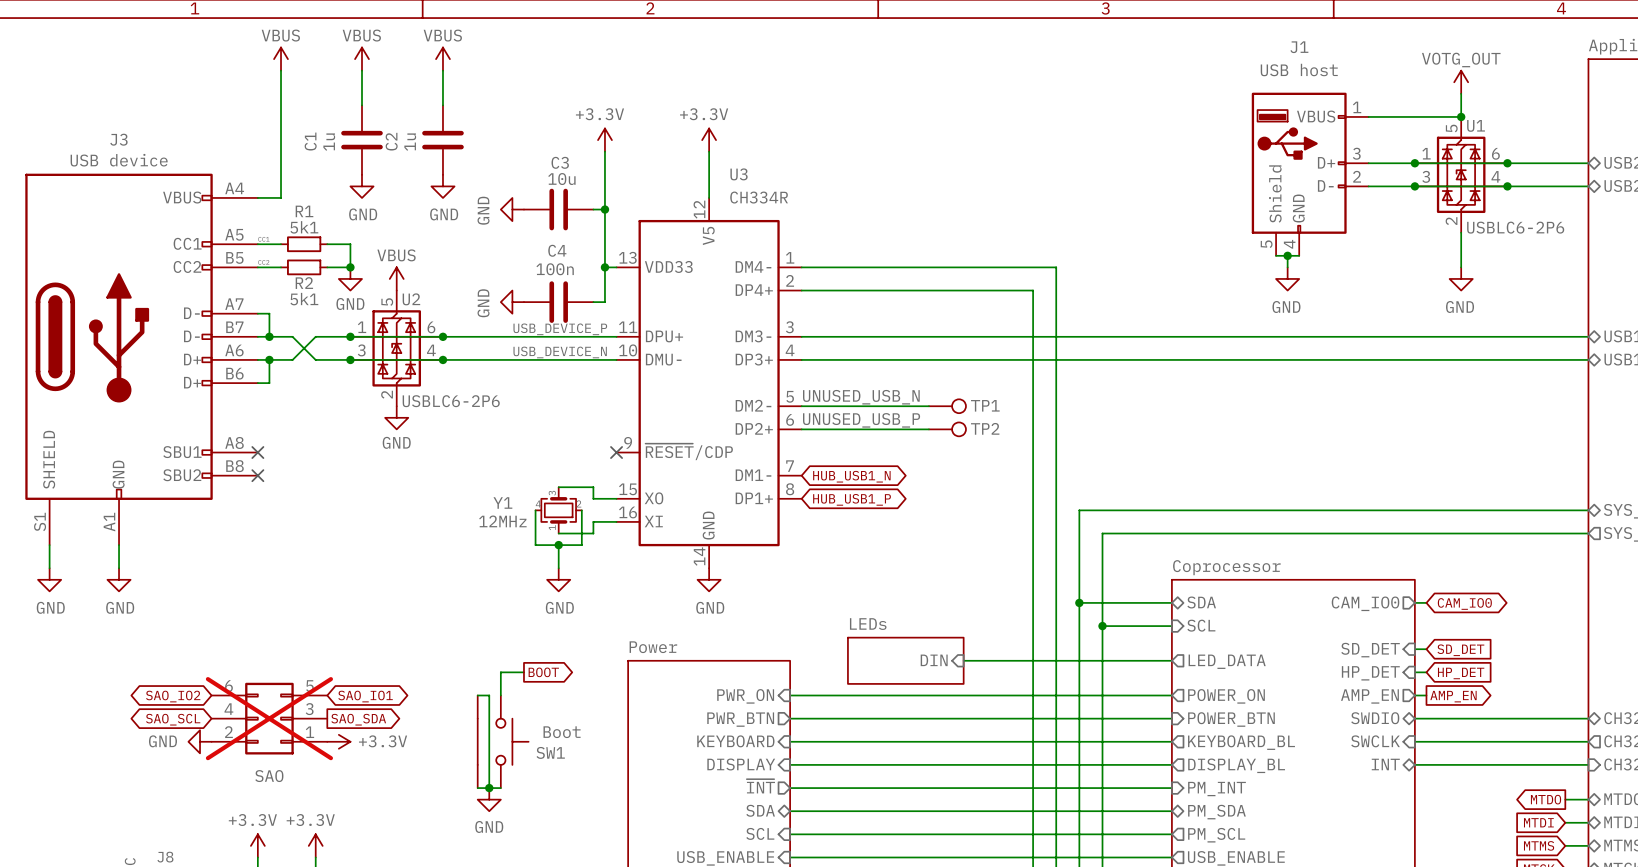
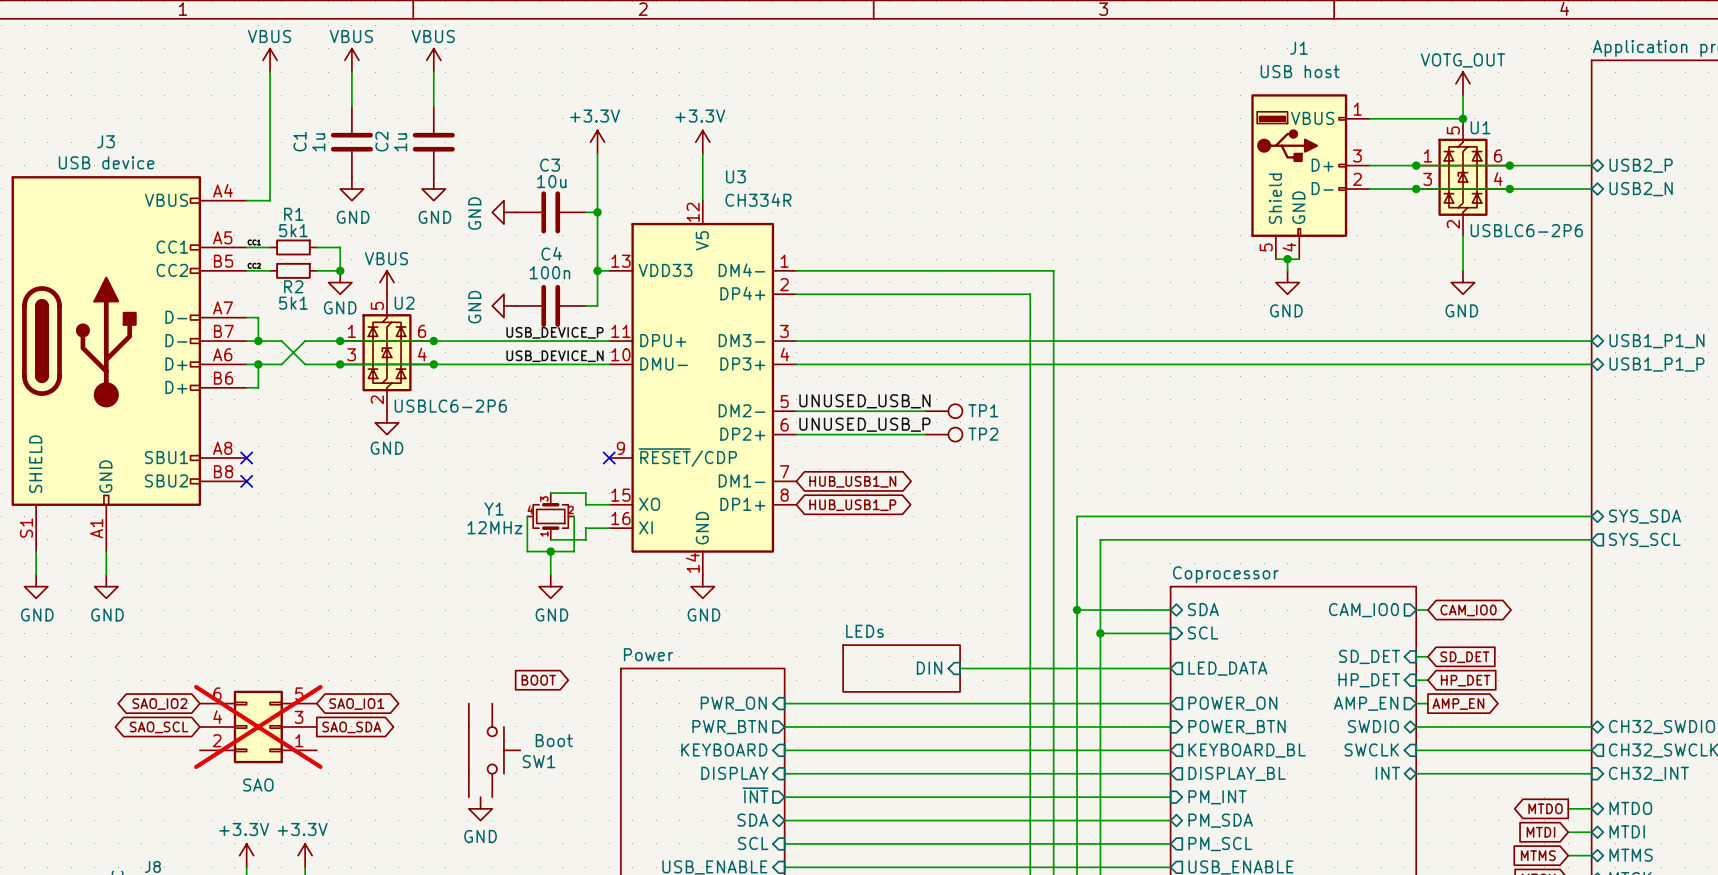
wire: (523, 672) (500, 672) (500, 695) -> none
wire: (477, 695) (489, 695) (489, 788) -> none
power symbol: GND (200, 741) -> none
power symbol: +3.3V (338, 741) -> none
wire: (477, 788) (500, 788) -> none
junction: (489, 788) -> none

